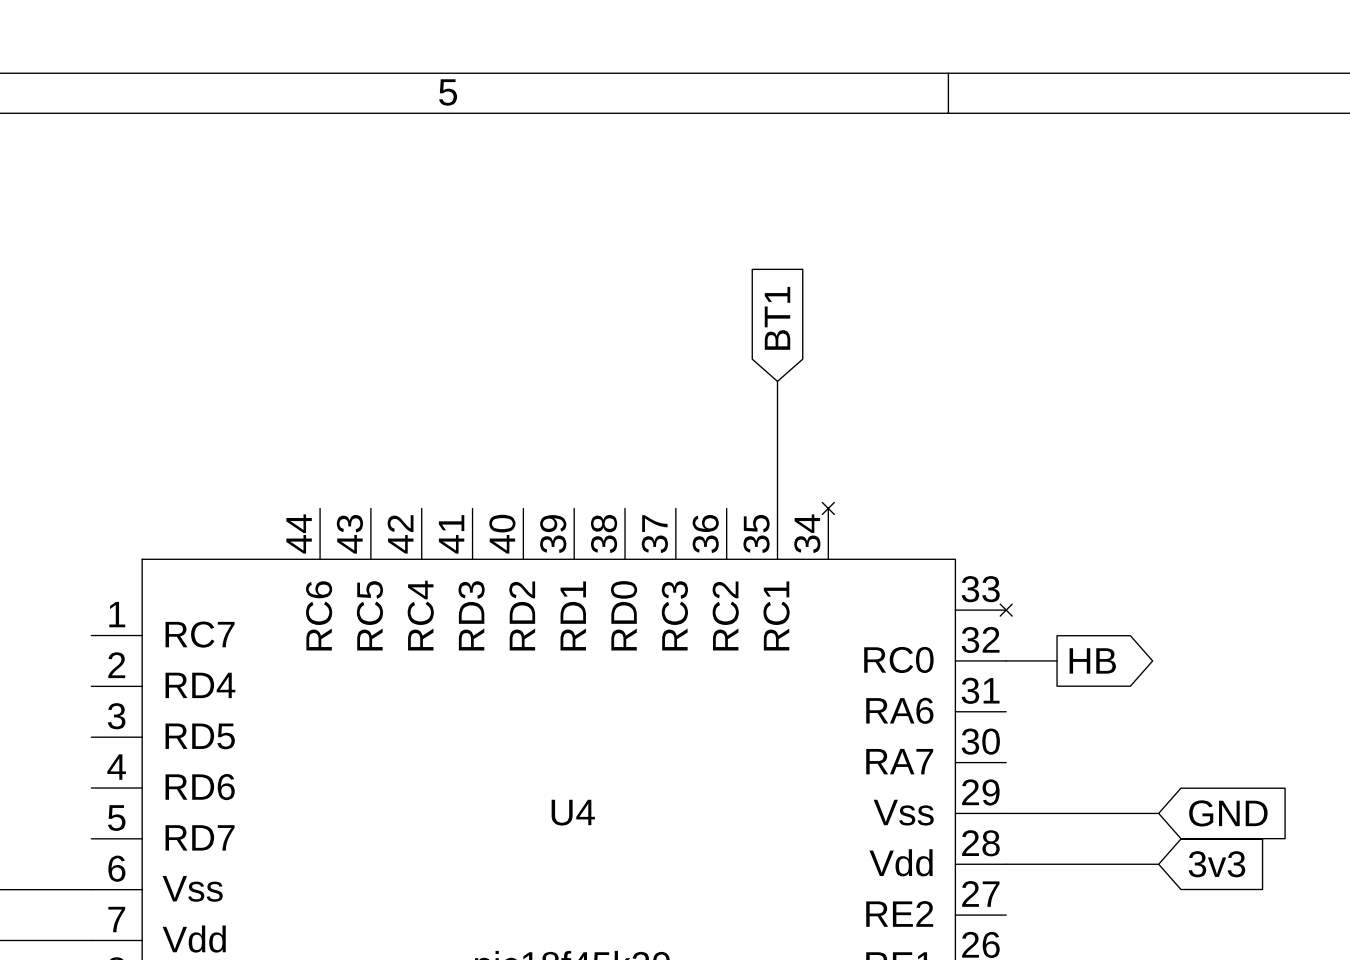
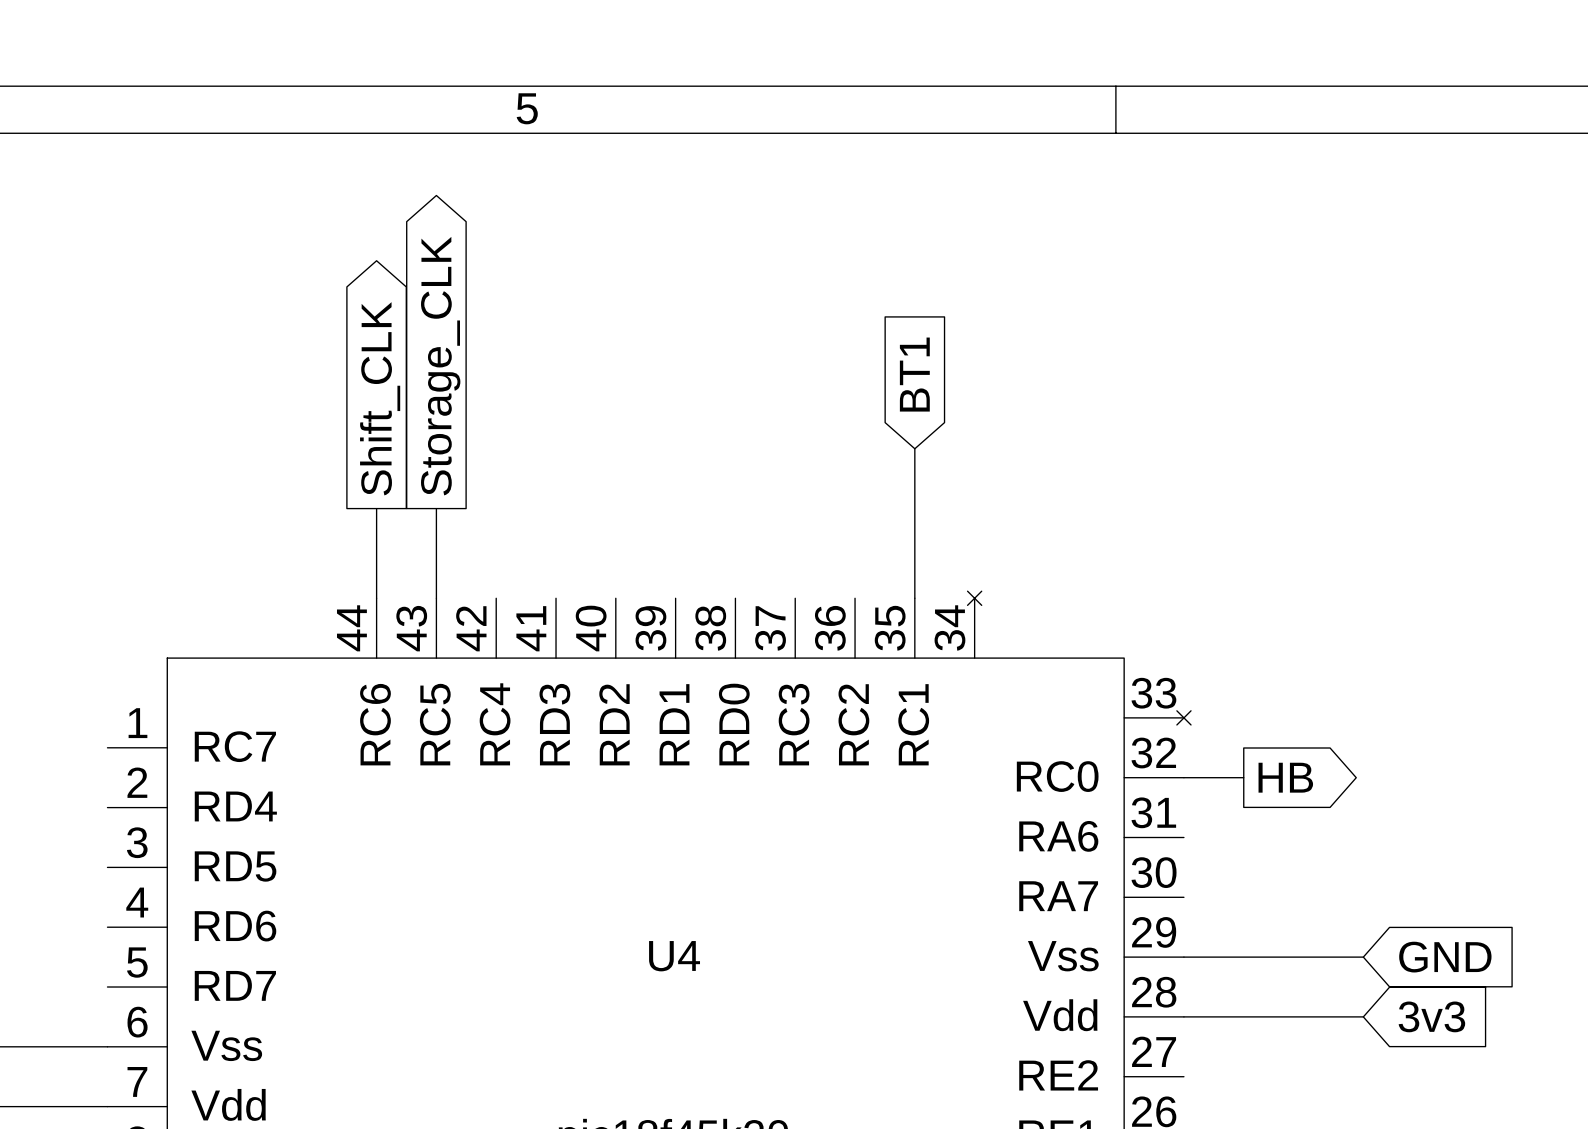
global label: none -> Storage_CLK (440, 366)
global label: none -> Shift_CLK (380, 398)
wire: none -> (376, 508) (376, 598)
wire: none -> (436, 508) (436, 598)

